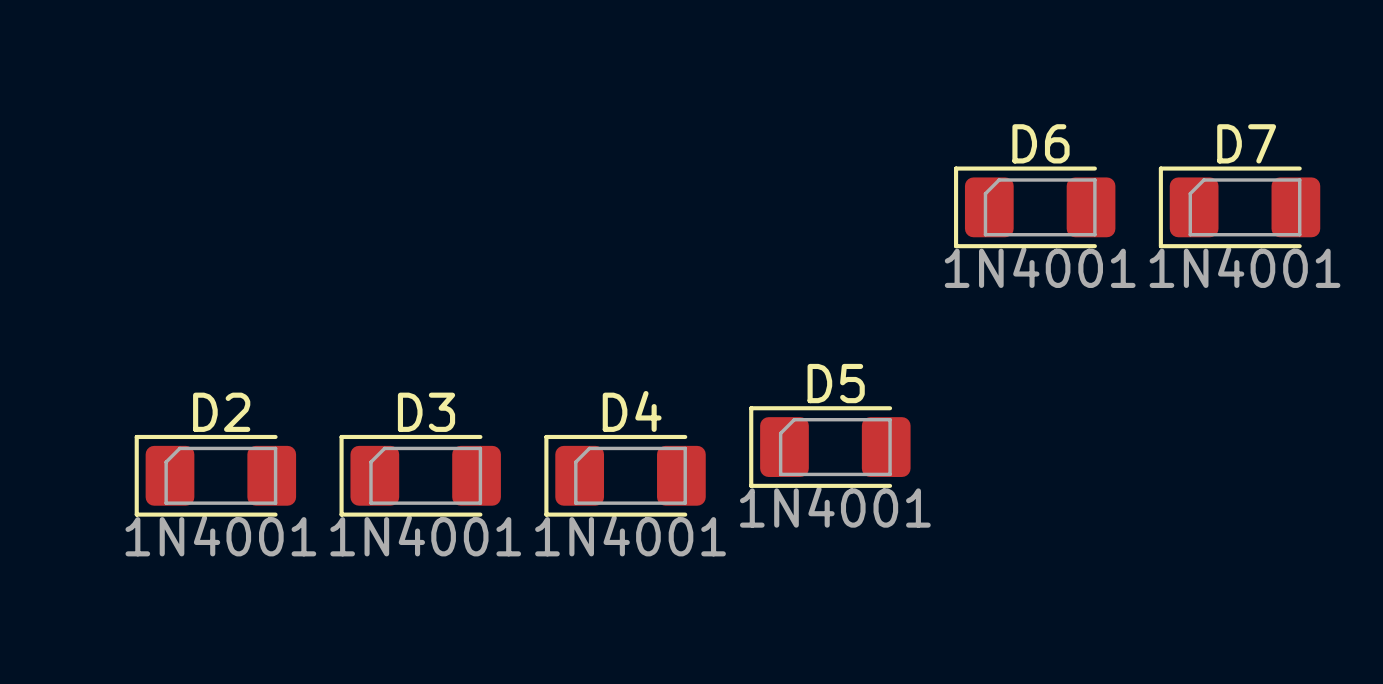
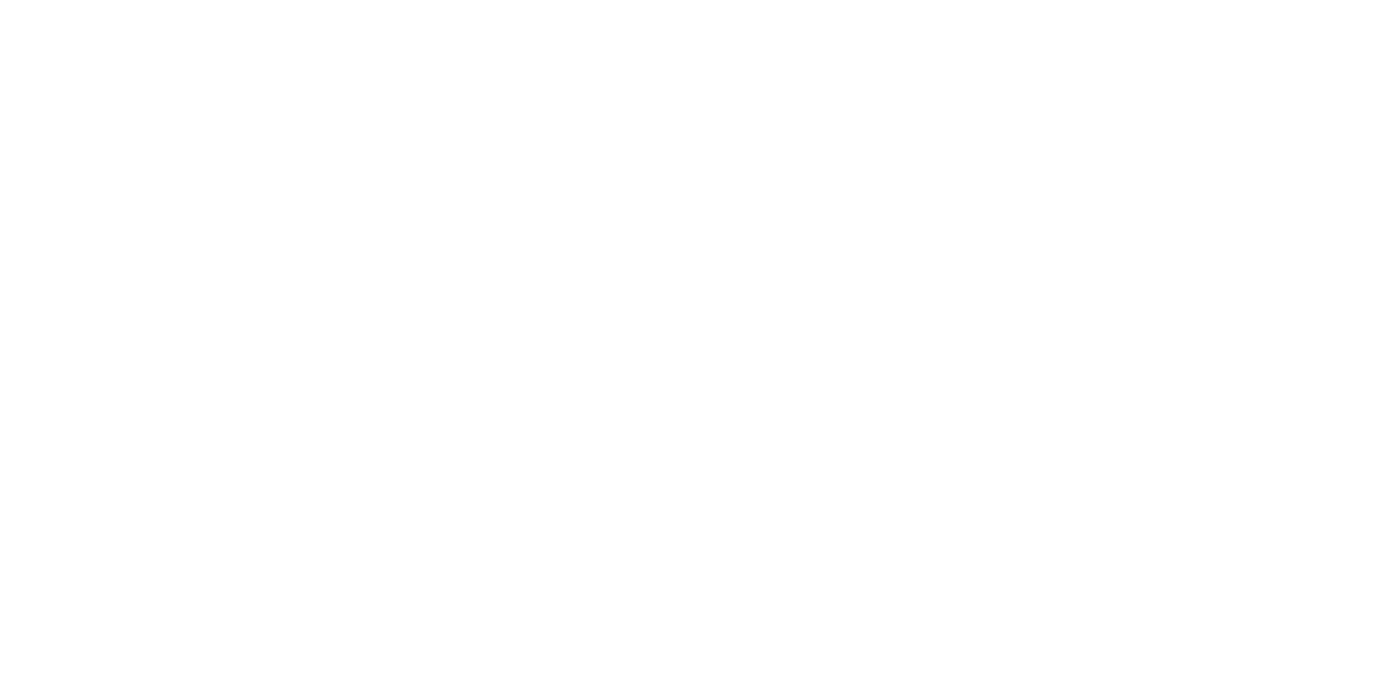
D6: 1N4001 (1034, 207) -> none
D7: 1N4001 (1239, 207) -> none
D5: 1N4001 (829, 447) -> none
D2: 1N4001 (215, 475) -> none
D3: 1N4001 (420, 475) -> none
D4: 1N4001 (625, 475) -> none

